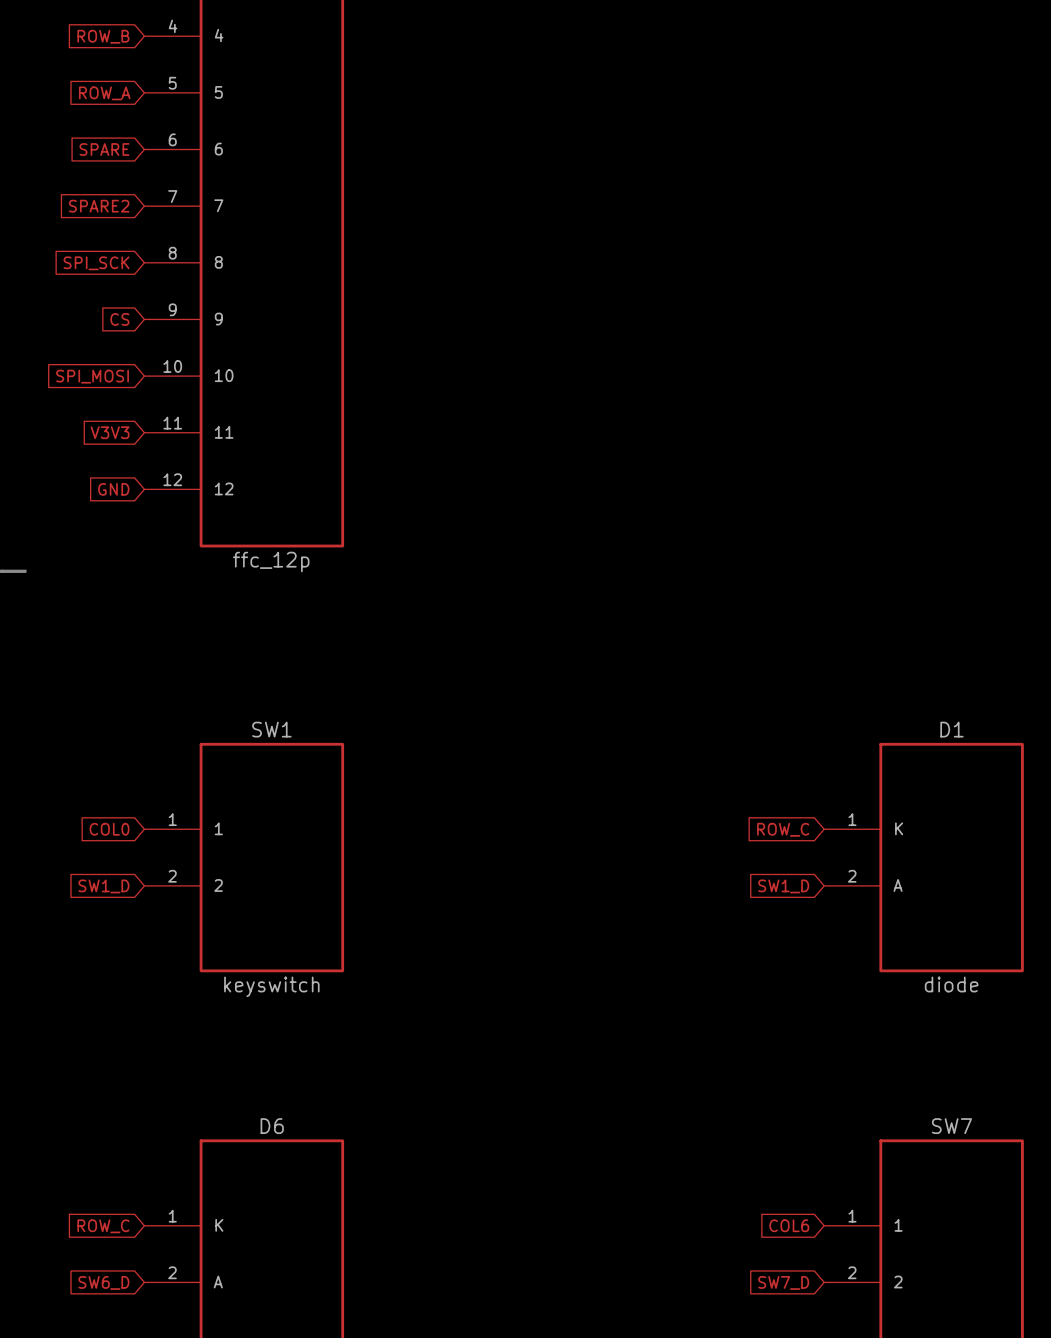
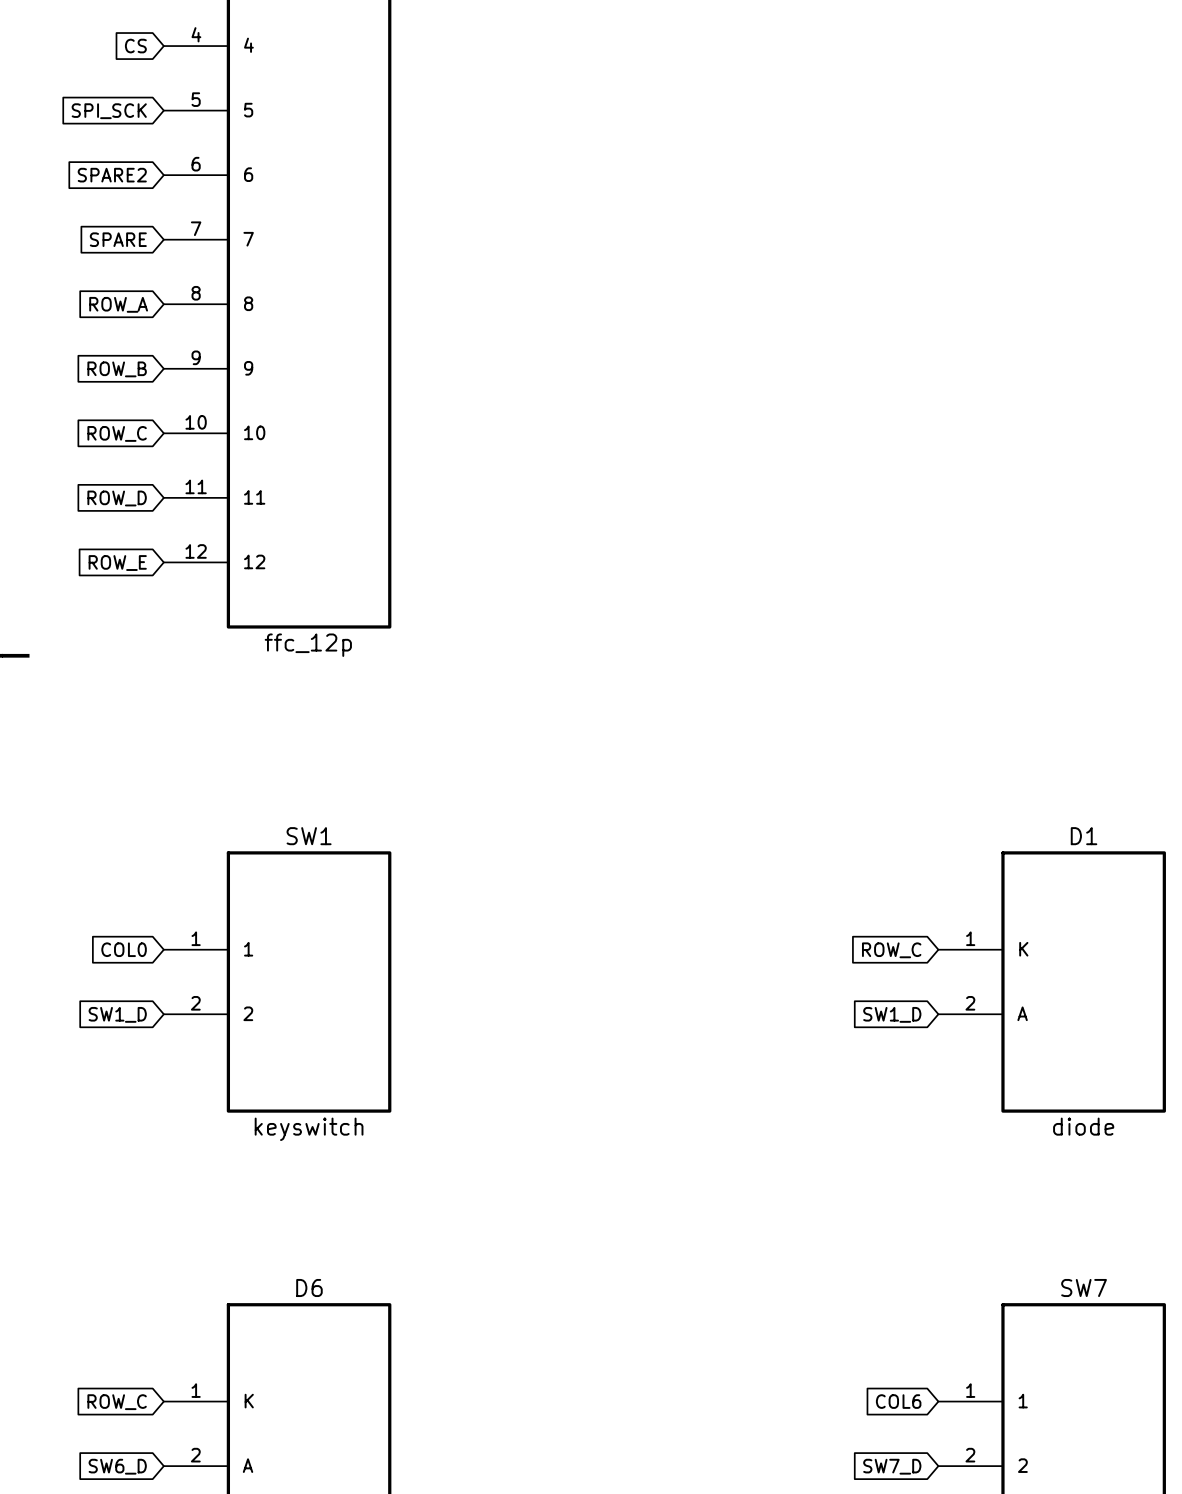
global label: ROW_B (103, 36) -> CS (135, 46)
global label: ROW_A (104, 93) -> SPI_SCK (109, 111)
global label: SPARE (104, 149) -> SPARE2 (112, 175)
global label: SPARE2 (99, 206) -> SPARE (118, 239)
global label: SPI_SCK (96, 263) -> ROW_A (118, 304)
global label: CS (119, 319) -> ROW_B (117, 369)
global label: SPI_MOSI (92, 376) -> ROW_C (117, 433)
global label: V3V3 (110, 432) -> ROW_D (117, 498)
global label: GND (113, 489) -> ROW_E (117, 563)

